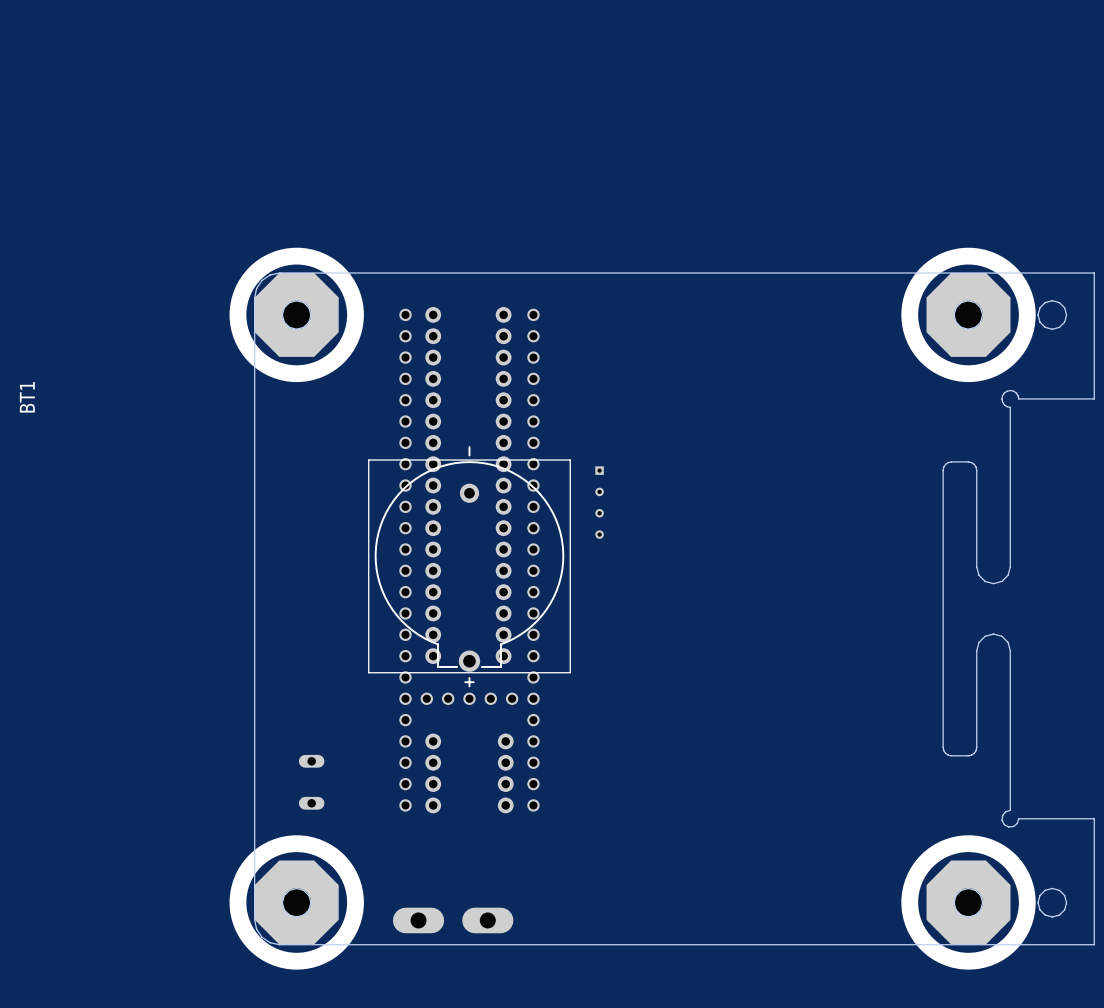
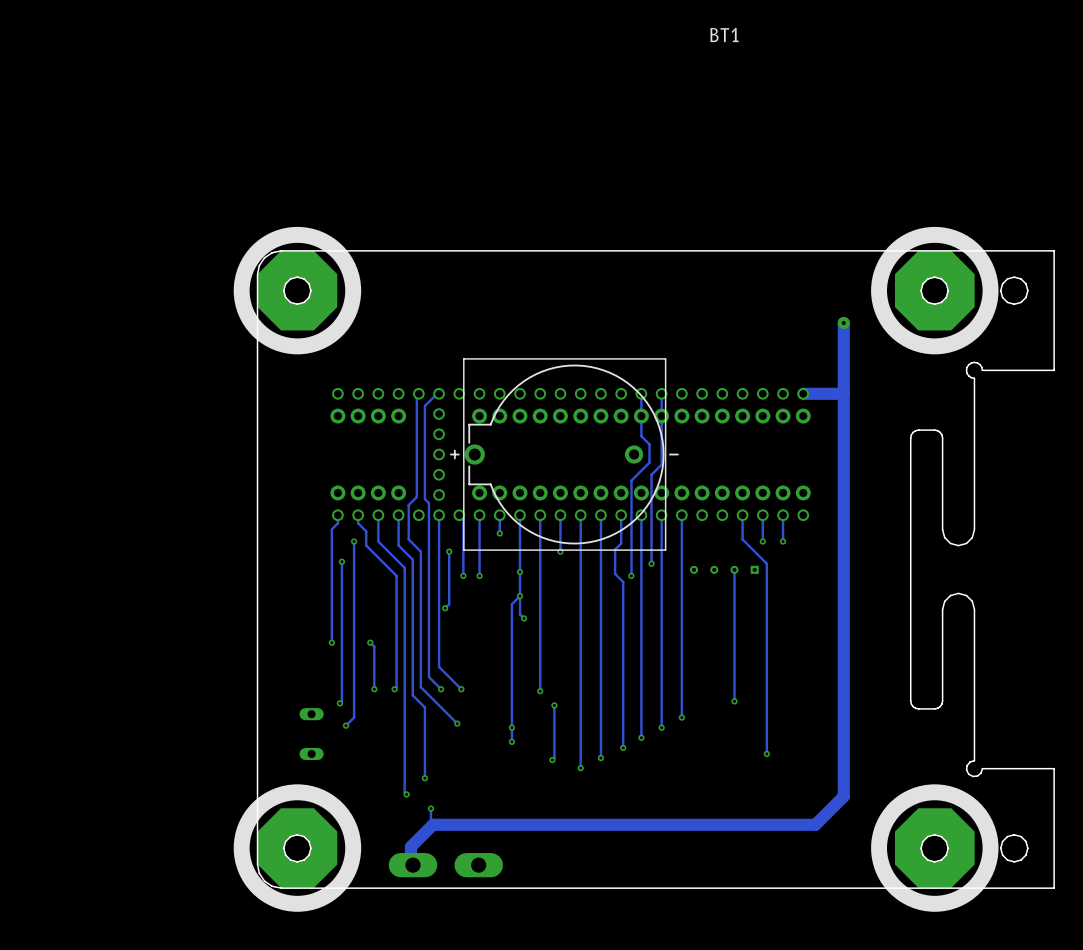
track: none -> (843, 323) (843, 796) (815, 824) (433, 824)
via: none -> (843, 323)
track: none -> (418, 393) (416, 395) (416, 497) (408, 505) (408, 539) (420, 551) (420, 687) (457, 723)
track: none -> (439, 393) (424, 405) (424, 499) (428, 503) (428, 677) (441, 689)
track: none -> (641, 393) (641, 436) (649, 444) (649, 462) (631, 480) (631, 575)
track: none -> (661, 393) (661, 464) (651, 474) (651, 563)
track: none -> (843, 393) (803, 393)
part: none -> (368, 416)
part: none -> (641, 416)
part: (433, 485) -> none
part: (503, 485) -> none
part rotation: 0° (599, 502) -> 90° clockwise (724, 569)
part position: (599, 502) -> (724, 569)
part: none -> (368, 492)
part: none -> (641, 492)
track: none -> (337, 515) (337, 523) (331, 529) (331, 642)
track: none -> (358, 515) (358, 523) (366, 531) (366, 545) (396, 575) (396, 687) (394, 689)
track: none -> (378, 515) (378, 541) (404, 567) (404, 792) (406, 794)
track: none -> (398, 515) (398, 545) (412, 559) (412, 695) (424, 707) (424, 778)
track: none -> (439, 515) (439, 666) (461, 689)
track: none -> (459, 515) (463, 519) (463, 575)
track: none -> (479, 515) (479, 575)
track: none -> (499, 515) (499, 533)
track: none -> (520, 515) (520, 614) (524, 618)
track: none -> (540, 515) (540, 691)
track: none -> (560, 515) (560, 551)
track: none -> (580, 515) (580, 768)
track: none -> (600, 515) (600, 758)
track: none -> (621, 515) (621, 543) (615, 549) (615, 573) (623, 581) (623, 747)
track: none -> (641, 515) (641, 737)
track: none -> (661, 515) (661, 727)
track: none -> (681, 515) (681, 717)
track: none -> (742, 515) (742, 539) (766, 563) (766, 753)
track: none -> (762, 515) (762, 541)
track: none -> (783, 515) (783, 541)
part rotation: 0° (469, 560) -> 90° clockwise (570, 454)
BT1 rotation: 0° (469, 566) -> 90° clockwise (564, 454)
via: none -> (499, 533)
track: none -> (354, 541) (354, 717) (346, 725)
via: none -> (354, 541)
via: none -> (762, 541)
via: none -> (783, 541)
track: none -> (449, 551) (449, 604) (445, 608)
via: none -> (449, 551)
via: none -> (560, 551)
track: none -> (341, 561) (341, 701) (339, 703)
via: none -> (341, 561)
via: none -> (651, 563)
track: none -> (734, 569) (734, 701)
via: none -> (520, 571)
via: none -> (463, 575)
via: none -> (479, 575)
via: none -> (631, 575)
track: none -> (520, 596) (511, 604) (511, 741)
via: none -> (520, 596)
via: none -> (445, 608)
via: none -> (524, 618)
via: none -> (331, 642)
track: none -> (370, 642) (374, 646) (374, 689)
via: none -> (370, 642)
via: none -> (374, 689)
via: none -> (394, 689)
via: none -> (441, 689)
via: none -> (461, 689)
via: none -> (540, 691)
via: none -> (734, 701)
via: none -> (339, 703)
track: none -> (554, 705) (554, 758) (552, 760)
via: none -> (554, 705)
via: none -> (681, 717)
via: none -> (457, 723)
via: none -> (346, 725)
part: (433, 773) -> none
part: (505, 773) -> none
via: none -> (511, 727)
via: none -> (661, 727)
via: none -> (641, 737)
via: none -> (511, 741)
via: none -> (623, 747)
via: none -> (766, 753)
via: none -> (600, 758)
via: none -> (552, 760)
via: none -> (580, 768)
via: none -> (424, 778)
via: none -> (406, 794)
track: none -> (430, 808) (430, 822) (433, 824)
via: none -> (430, 808)
track: none -> (433, 824) (410, 846) (410, 865)

